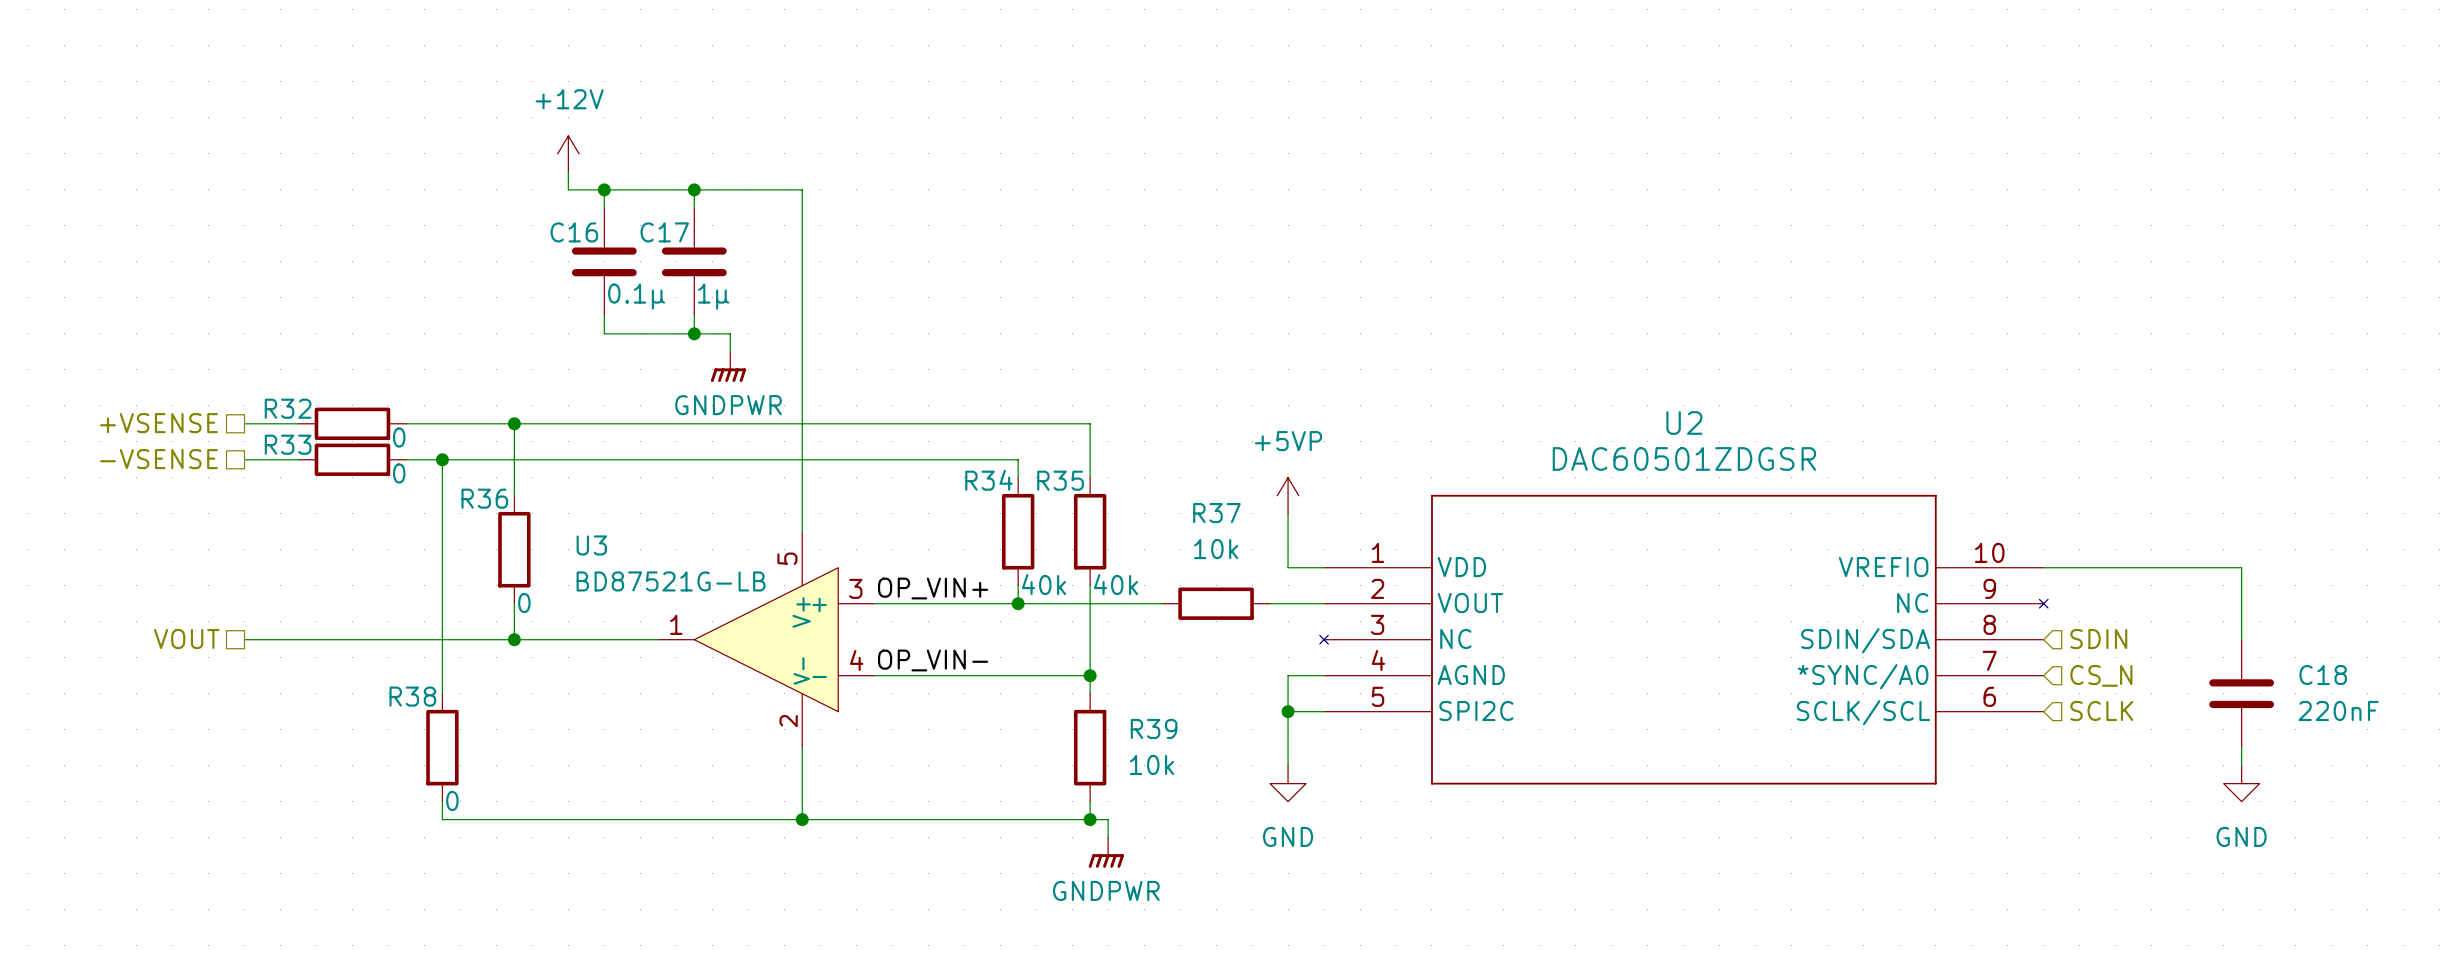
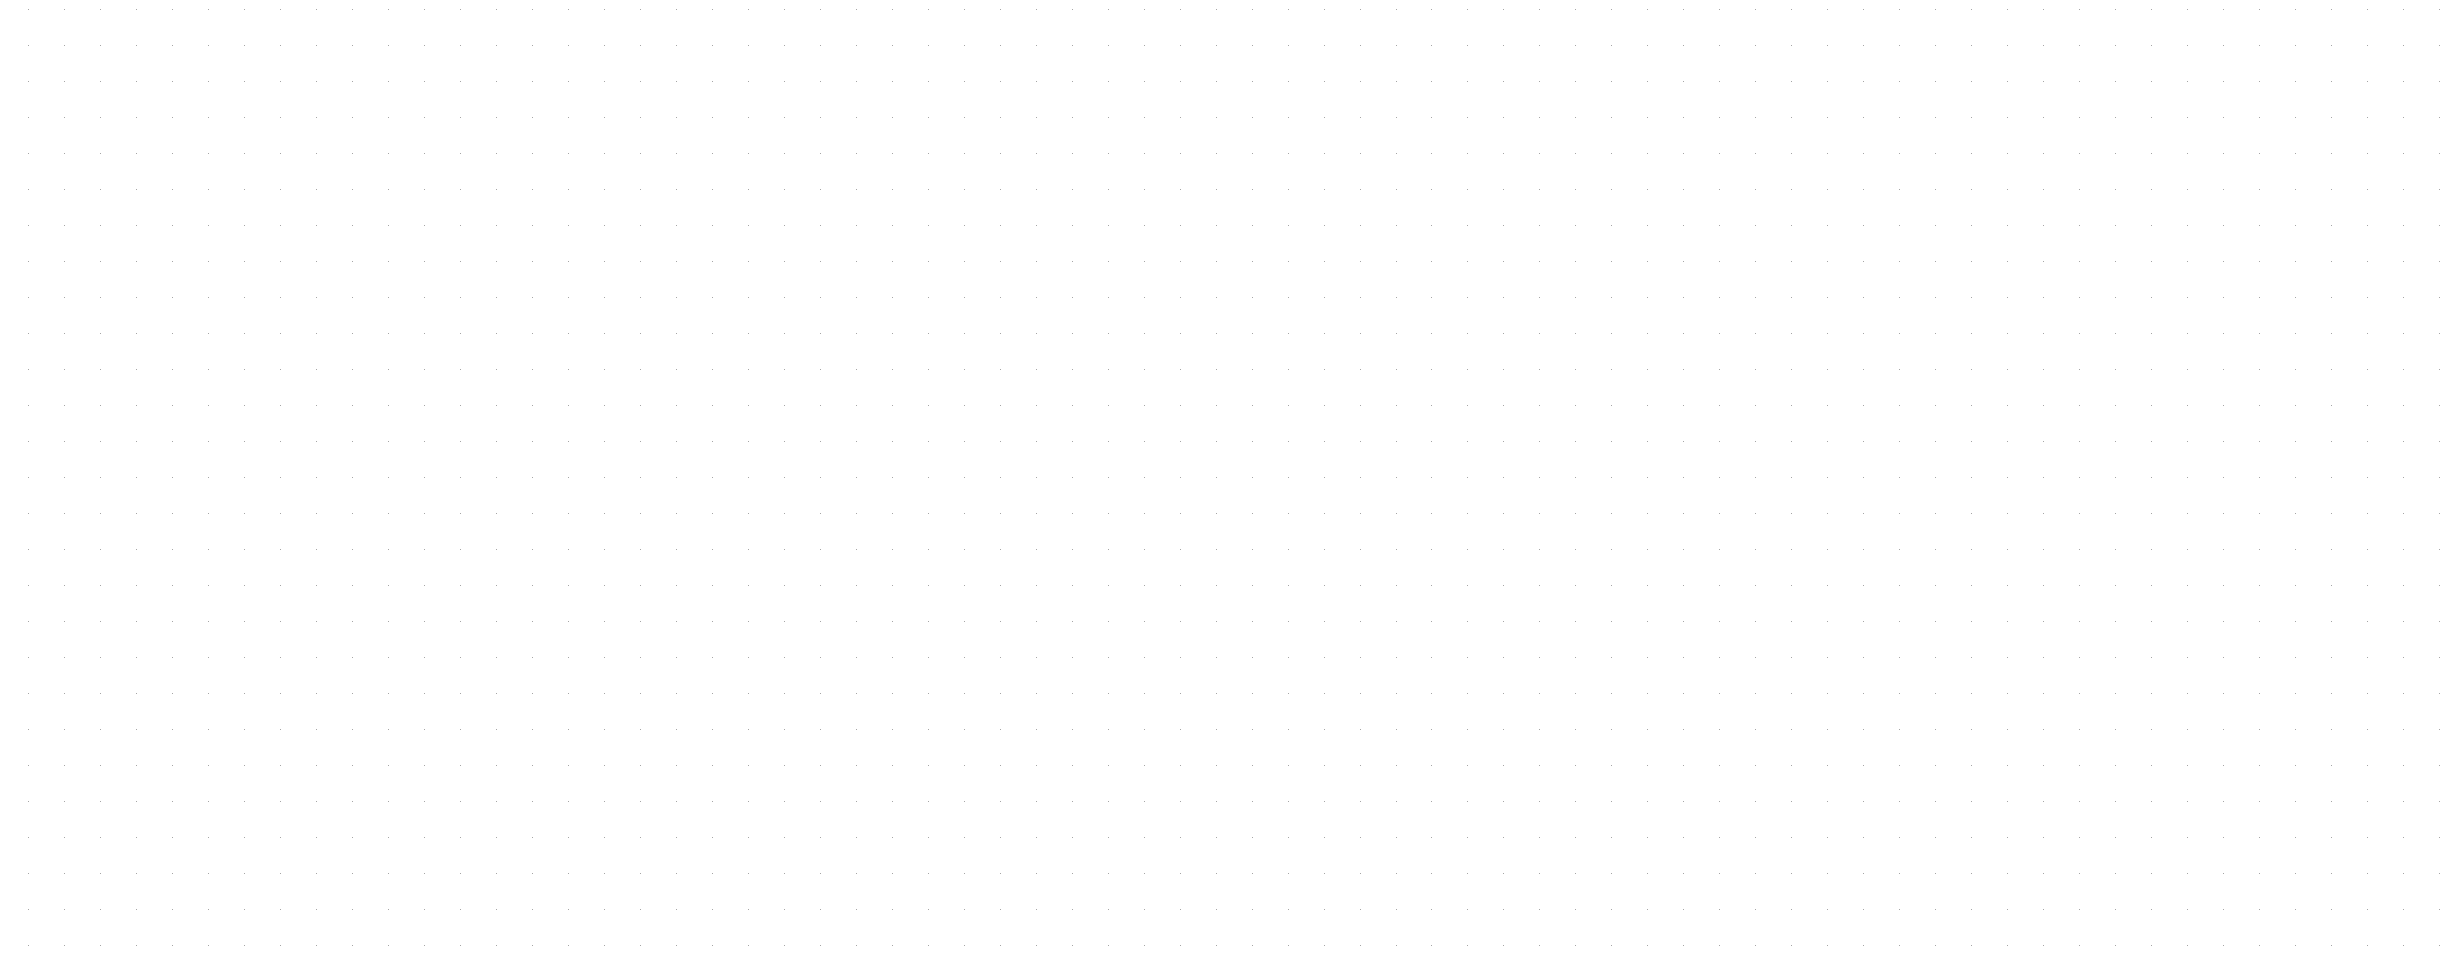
power symbol: +12V (568, 153) -> none
wire: (568, 171) (568, 189) (802, 189) (802, 531) -> none
wire: (604, 189) (604, 207) -> none
junction: (604, 189) -> none
wire: (694, 189) (694, 207) -> none
junction: (694, 189) -> none
C16: 0.1μ (604, 261) -> none
C17: 1μ (694, 261) -> none
wire: (604, 315) (604, 333) (730, 333) (730, 351) -> none
wire: (694, 315) (694, 333) -> none
junction: (694, 333) -> none
power symbol: GNDPWR (728, 366) -> none
hierarchical label: +VSENSE (158, 423) -> none
wire: (244, 423) (298, 423) -> none
R32: 0 (352, 423) -> none
wire: (406, 423) (1090, 423) (1090, 477) -> none
wire: (514, 423) (514, 495) -> none
junction: (514, 423) -> none
hierarchical label: -VSENSE (158, 459) -> none
wire: (244, 459) (298, 459) -> none
R33: 0 (352, 459) -> none
wire: (406, 459) (1018, 459) (1018, 477) -> none
wire: (442, 459) (442, 693) -> none
junction: (442, 459) -> none
power symbol: +5VP (1288, 495) -> none
wire: (1288, 513) (1288, 567) (1324, 567) -> none
R34: 40k (1018, 531) -> none
R35: 40k (1090, 531) -> none
R36: 0 (514, 549) -> none
wire: (2043, 567) (2241, 567) (2241, 639) -> none
wire: (1018, 585) (1018, 603) -> none
wire: (1090, 585) (1090, 693) -> none
label: OP_VIN+ (933, 588) -> none
wire: (514, 603) (514, 639) -> none
wire: (874, 603) (1162, 603) -> none
junction: (1018, 603) -> none
R37: 10k (1216, 603) -> none
wire: (1270, 603) (1324, 603) -> none
hierarchical label: VOUT (186, 639) -> none
wire: (244, 639) (658, 639) -> none
junction: (514, 639) -> none
U3: BD87521G-LB (766, 639) -> none
U2: DAC60501ZDGSR (1683, 639) -> none
hierarchical label: SDIN (2098, 639) -> none
label: OP_VIN- (933, 660) -> none
wire: (874, 675) (1090, 675) -> none
junction: (1090, 675) -> none
wire: (1324, 675) (1288, 675) (1288, 765) -> none
hierarchical label: CS_N (2101, 675) -> none
C18: 220nF (2241, 693) -> none
hierarchical label: SCLK (2101, 710) -> none
wire: (1288, 711) (1324, 711) -> none
junction: (1288, 711) -> none
R38: 0 (442, 747) -> none
wire: (802, 747) (802, 819) -> none
R39: 10k (1090, 747) -> none
wire: (2241, 747) (2241, 765) -> none
power symbol: GND (1288, 783) -> none
power symbol: GND (2241, 783) -> none
wire: (442, 801) (442, 819) (1108, 819) (1108, 837) -> none
wire: (1090, 801) (1090, 819) -> none
junction: (802, 819) -> none
junction: (1090, 819) -> none
power symbol: GNDPWR (1106, 852) -> none

